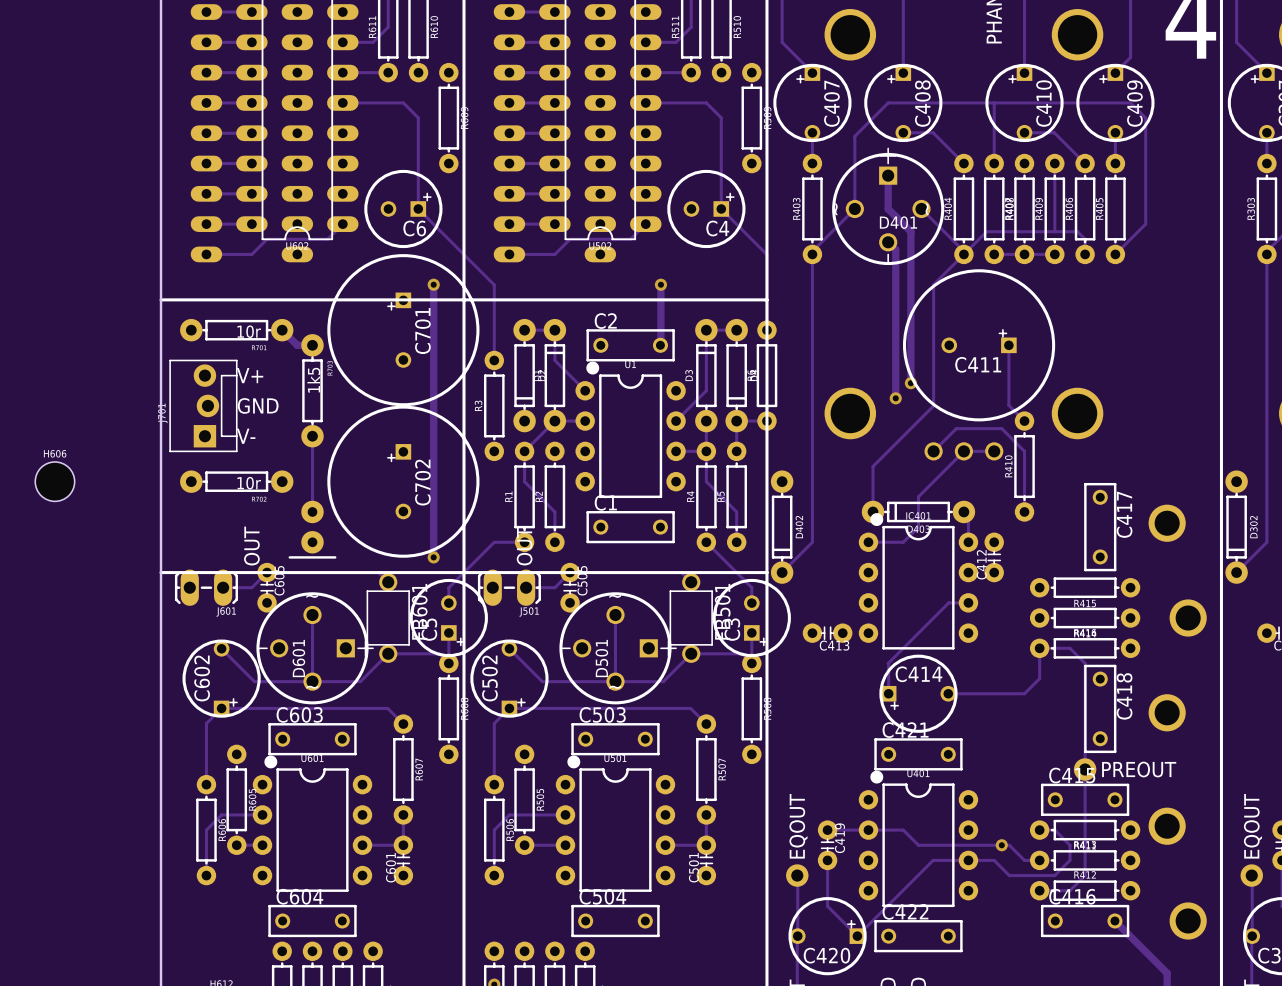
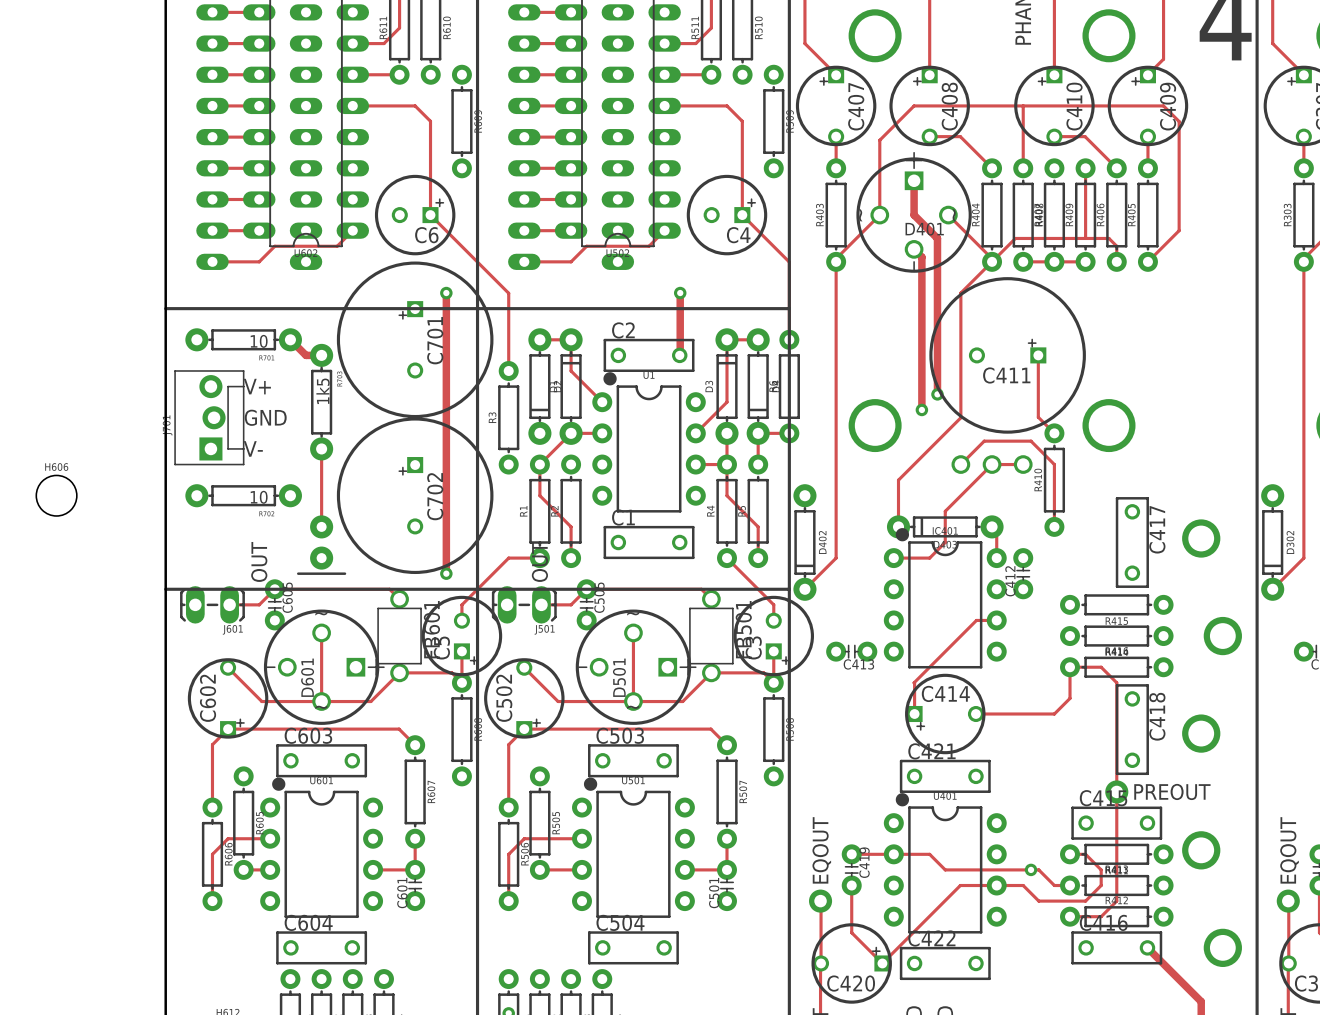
part value: 10r (249, 331) -> 10 (259, 341)
part value: 10r (249, 483) -> 10 (259, 497)

